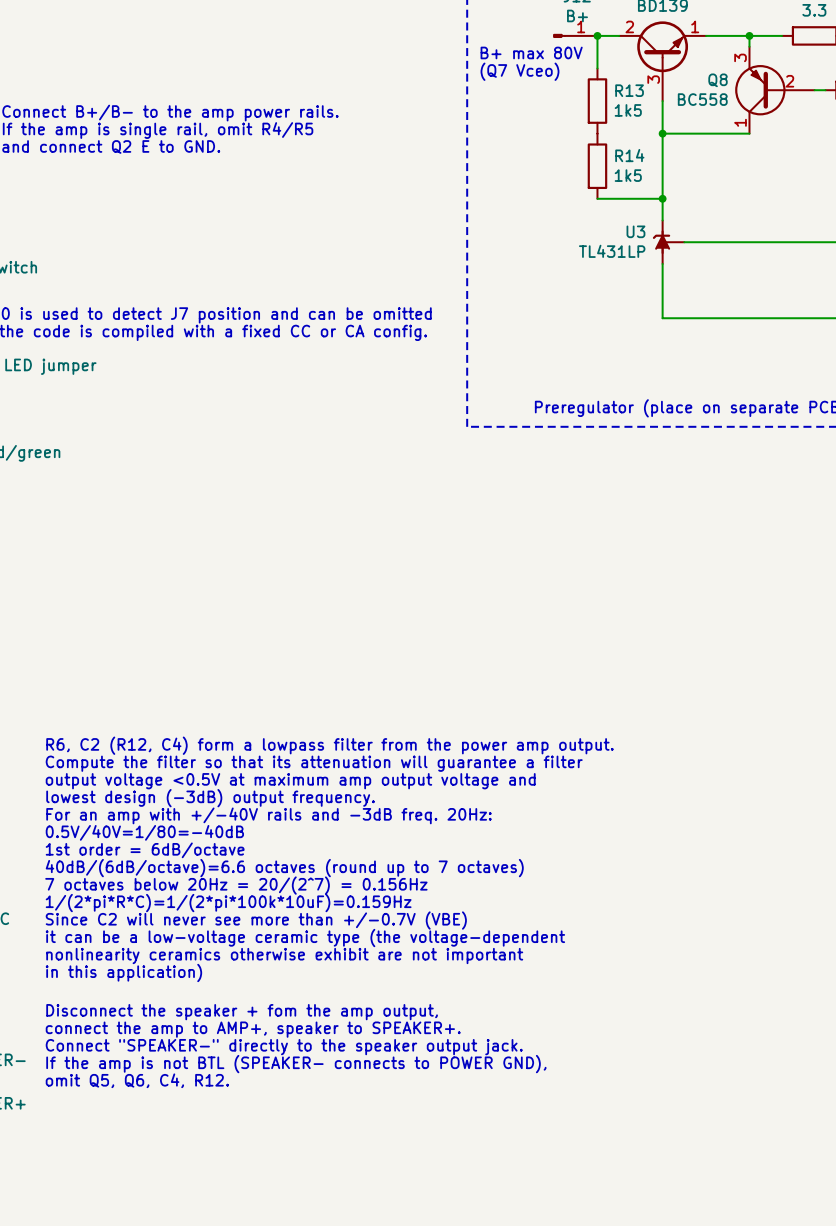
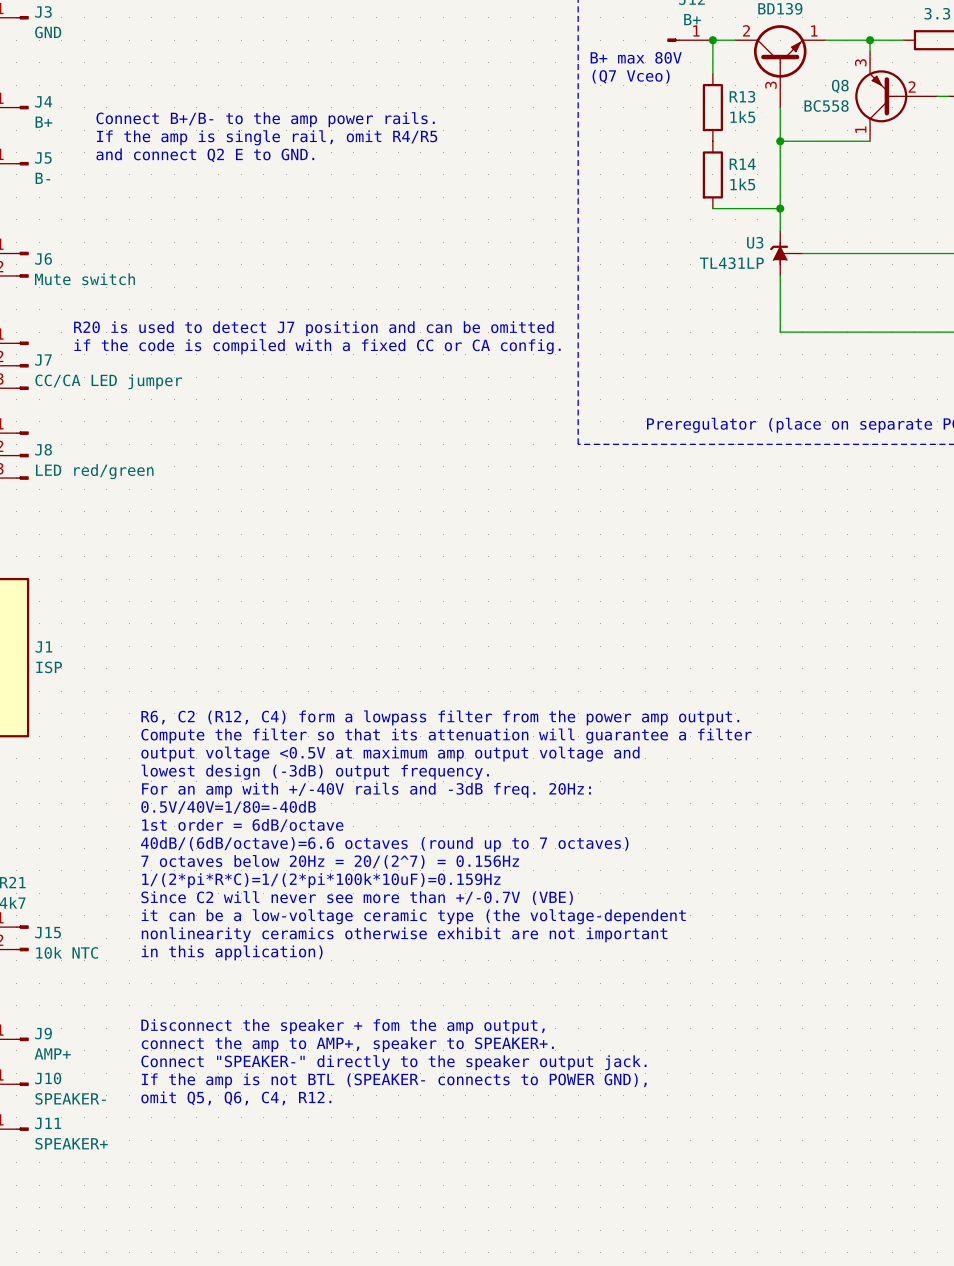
text position: R6, C2 (R12, C4) form a lowpass filter from the power amp output. (329, 745) -> R6, C2 (R12, C4) form a lowpass filter from the power amp output. (440, 717)
text position: Compute the filter so that its attenuation will guarantee a filter (314, 763) -> Compute the filter so that its attenuation will guarantee a filter (446, 736)
text position: output voltage <0.5V at maximum amp output voltage and (290, 781) -> output voltage <0.5V at maximum amp output voltage and (390, 754)
text position: lowest design (-3dB) output frequency. (210, 798) -> lowest design (-3dB) output frequency. (315, 772)
text position: For an amp with +/-40V rails and -3dB freq. 20Hz: (268, 815) -> For an amp with +/-40V rails and -3dB freq. 20Hz: (366, 790)
text position: 0.5V/40V=1/80=-40dB (144, 832) -> 0.5V/40V=1/80=-40dB (228, 807)
text position: 1st order = 6dB/octave (145, 850) -> 1st order = 6dB/octave (242, 825)
text position: 40dB/(6dB/octave)=6.6 octaves (round up to 7 octaves) (284, 868) -> 40dB/(6dB/octave)=6.6 octaves (round up to 7 octaves) (384, 844)
text position: 7 octaves below 20Hz = 20/(2^7) = 0.156Hz (236, 885) -> 7 octaves below 20Hz = 20/(2^7) = 0.156Hz (330, 861)
text position: 1/(2*pi*R*C)=1/(2*pi*100k*10uF)=0.159Hz (228, 903) -> 1/(2*pi*R*C)=1/(2*pi*100k*10uF)=0.159Hz (321, 880)
text position: Since C2 will never see more than +/-0.7V (VBE) (256, 920) -> Since C2 will never see more than +/-0.7V (VBE) (357, 898)
text position: it can be a low-voltage ceramic type (the voltage-dependent (305, 938) -> it can be a low-voltage ceramic type (the voltage-dependent (413, 916)
text position: nonlinearity ceramics otherwise exhibit are not important (284, 956) -> nonlinearity ceramics otherwise exhibit are not important (404, 934)
text position: in this application) (123, 972) -> in this application) (232, 952)
text position: Disconnect the speaker + fom the amp output, (242, 1012) -> Disconnect the speaker + fom the amp output, (343, 1026)
text position: connect the amp to AMP+, speaker to SPEAKER+. (253, 1029) -> connect the amp to AMP+, speaker to SPEAKER+. (347, 1044)
text position: Connect "SPEAKER-" directly to the speaker output jack. (284, 1047) -> Connect "SPEAKER-" directly to the speaker output jack. (393, 1062)
text position: If the amp is not BTL (SPEAKER- connects to POWER GND), (296, 1064) -> If the amp is not BTL (SPEAKER- connects to POWER GND), (394, 1080)
text position: omit Q5, Q6, C4, R12. (137, 1080) -> omit Q5, Q6, C4, R12. (236, 1098)

